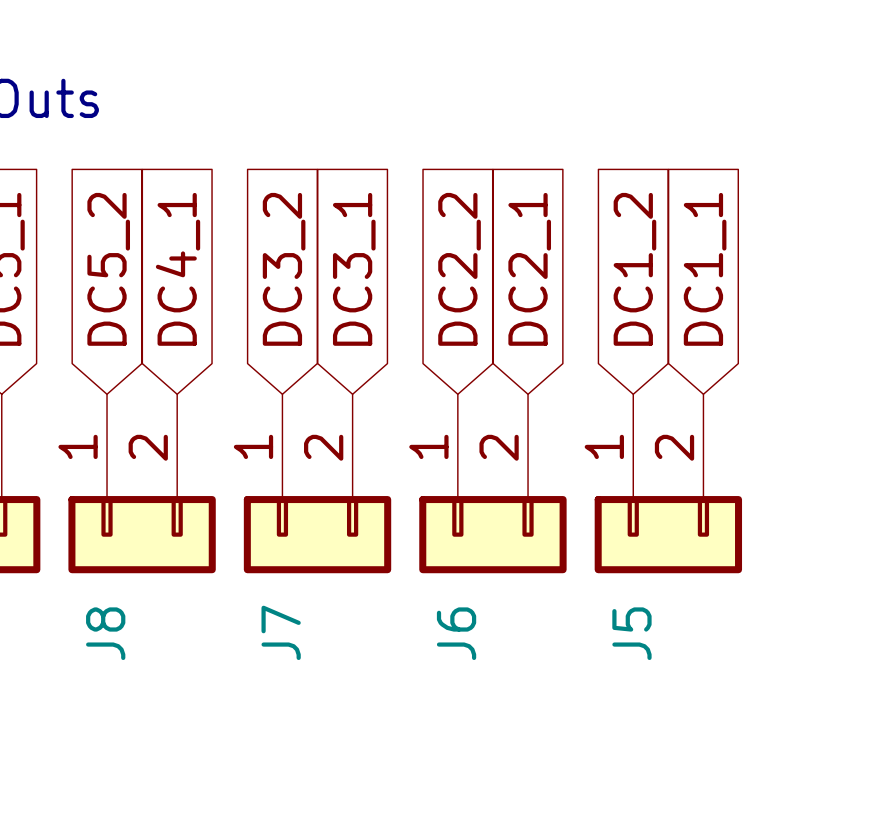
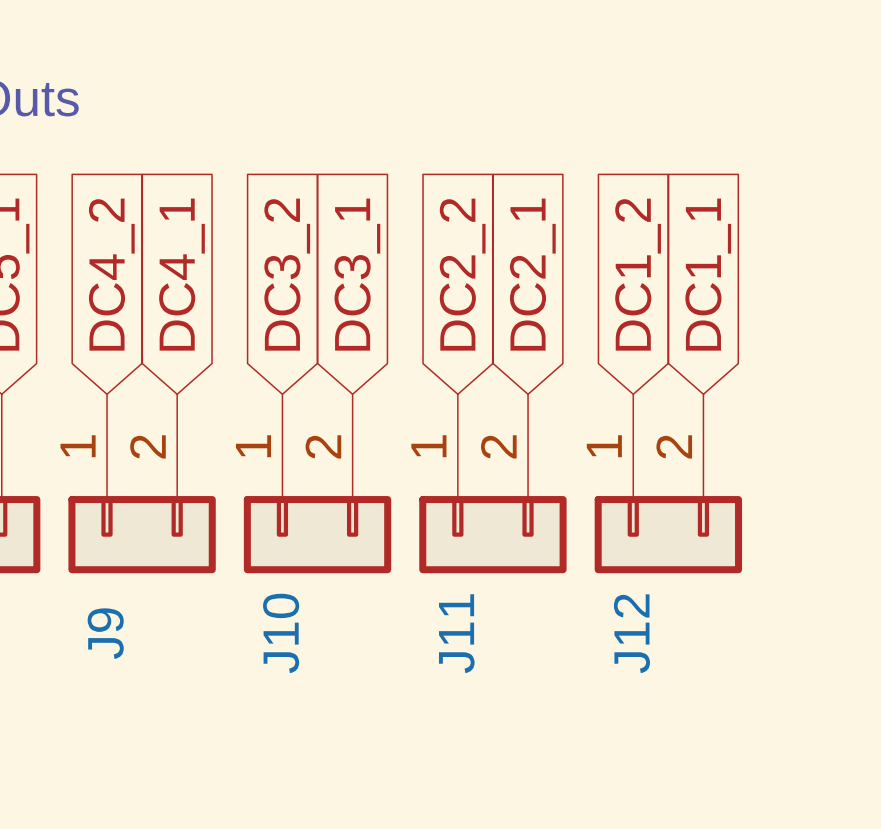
global label: DC5_2 (108, 269) -> DC4_2 (111, 274)
J7 name: J7 (281, 632) -> J10 (281, 633)
J8 name: J8 (105, 633) -> J9 (105, 633)
J6 name: J6 (456, 633) -> J11 (456, 633)
J5 name: J5 (631, 633) -> J12 (631, 633)

